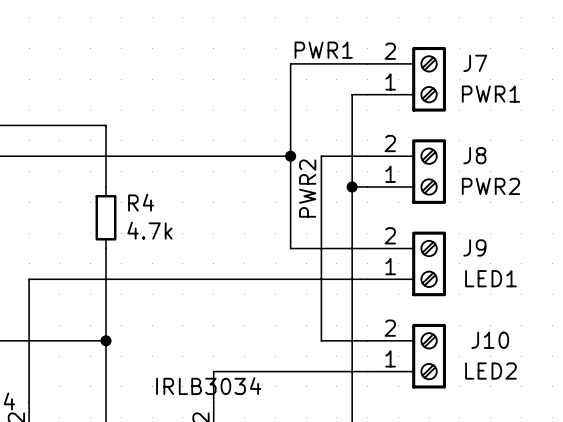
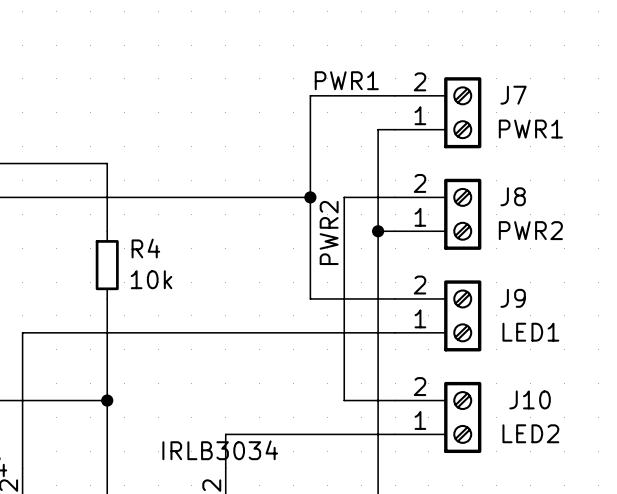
R4 value: 4.7k (149, 230) -> 10k (151, 279)

